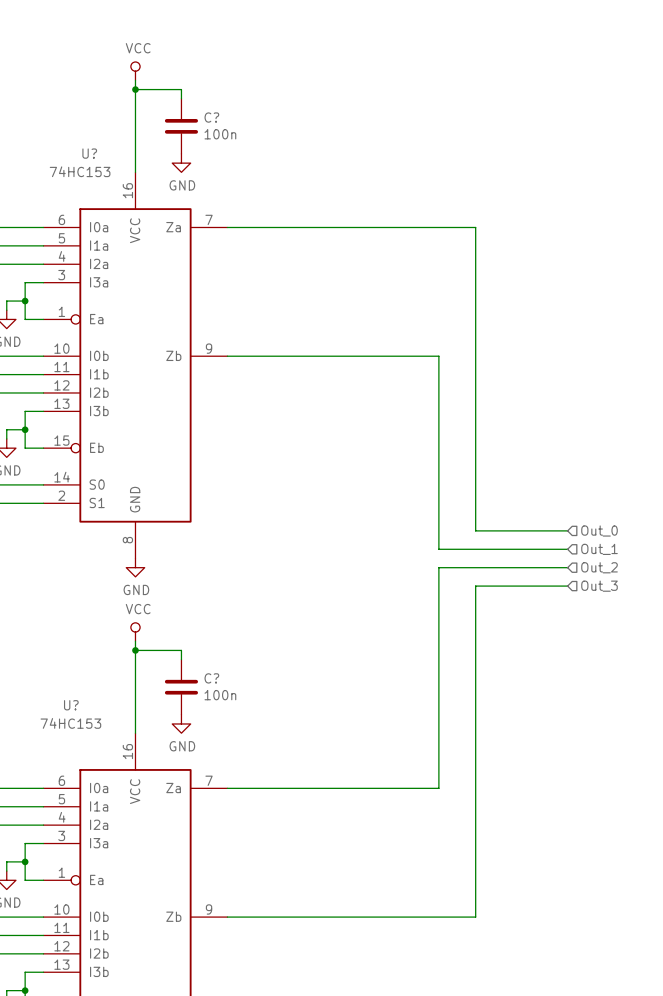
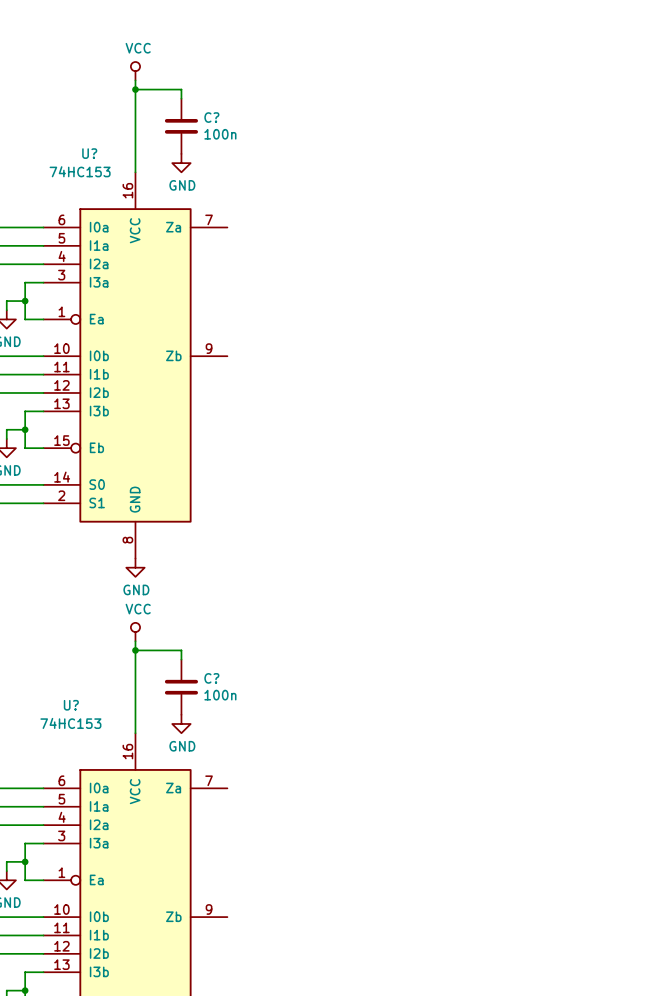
wire: (227, 227) (475, 227) (475, 530) (567, 530) -> none
wire: (227, 356) (438, 356) (438, 549) (567, 549) -> none
hierarchical label: Out_0 (599, 531) -> none
hierarchical label: Out_1 (599, 549) -> none
wire: (567, 567) (438, 567) (438, 788) (227, 788) -> none
hierarchical label: Out_2 (599, 567) -> none
wire: (567, 586) (475, 586) (475, 917) (227, 917) -> none
hierarchical label: Out_3 (599, 586) -> none

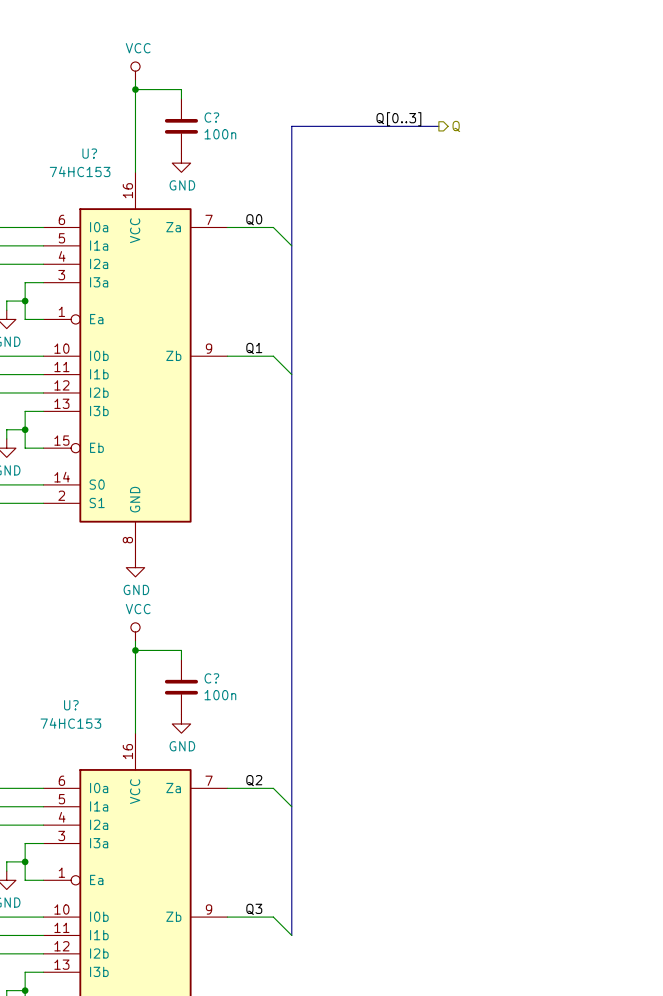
label: none -> Q[0..3] (398, 119)
bus: none -> (438, 126) (291, 126) (291, 935)
hierarchical label: none -> Q (456, 126)
label: none -> Q0 (254, 219)
wire: none -> (227, 227) (273, 227) (291, 245)
label: none -> Q1 (254, 348)
wire: none -> (227, 356) (273, 356) (291, 374)
label: none -> Q2 (254, 780)
wire: none -> (227, 788) (273, 788) (291, 806)
label: none -> Q3 (254, 909)
wire: none -> (227, 917) (273, 917) (291, 935)

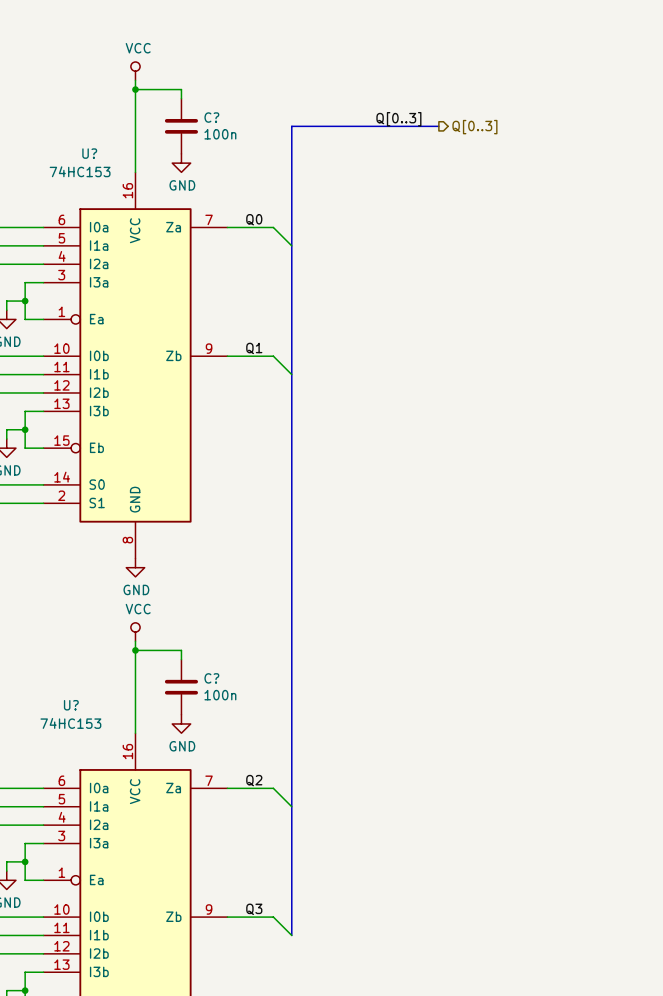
hierarchical label: Q (456, 126) -> Q[0..3] (474, 127)

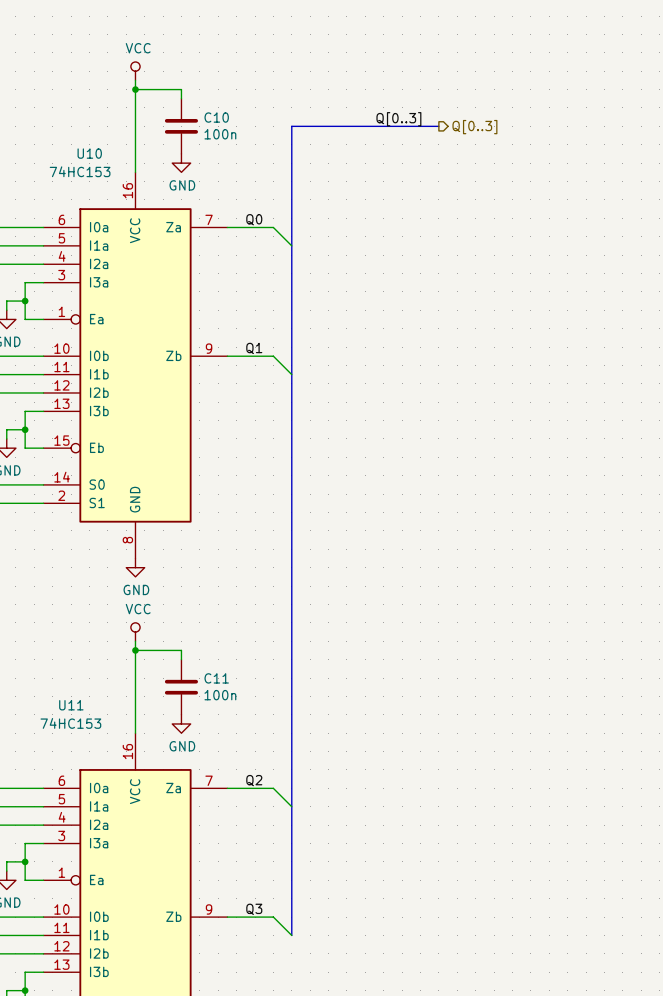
C? name: C? (211, 117) -> C10 (216, 117)
U? name: U? (89, 153) -> U10 (89, 153)
C? name: C? (211, 678) -> C11 (216, 678)
U? name: U? (71, 705) -> U11 (71, 705)

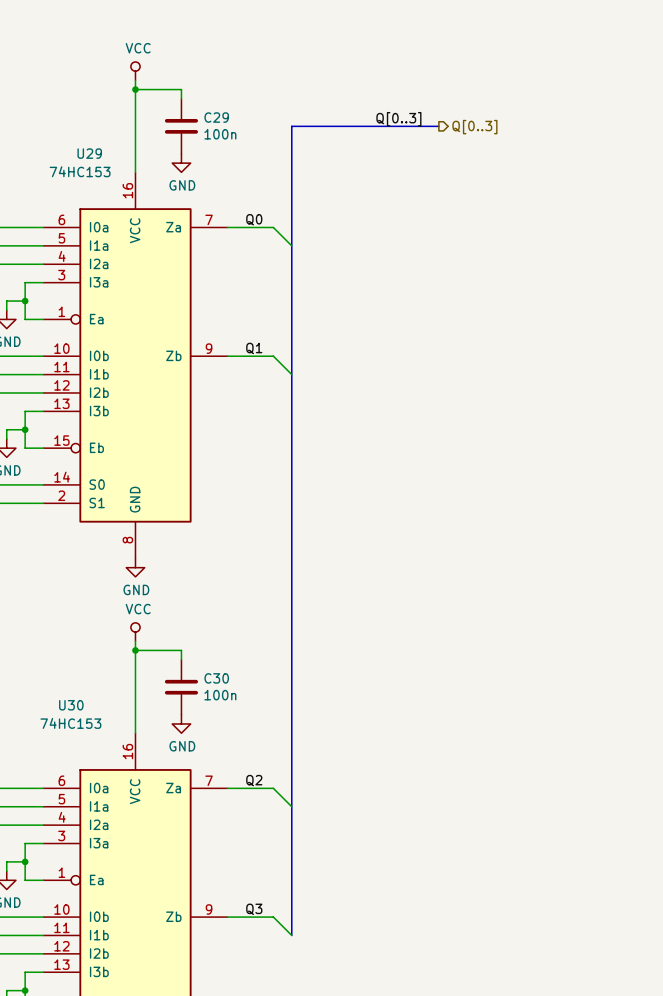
C10 name: C10 (216, 117) -> C29 (216, 117)
U10 name: U10 (89, 153) -> U29 (89, 153)
C11 name: C11 (216, 678) -> C30 (216, 678)
U11 name: U11 (71, 705) -> U30 (71, 705)

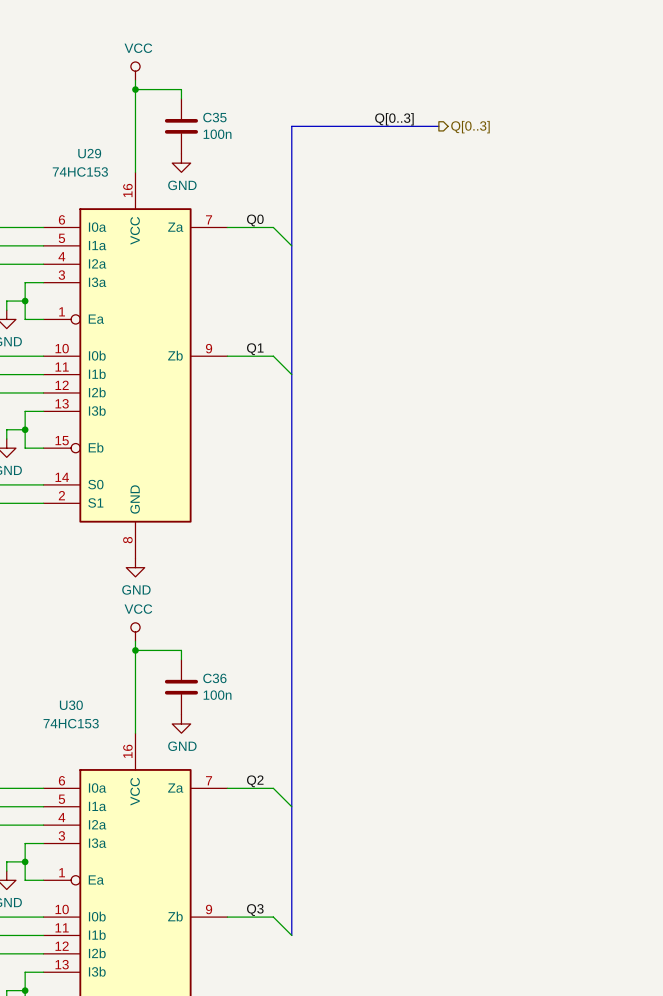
C29 name: C29 (216, 117) -> C35 (214, 117)
C30 name: C30 (216, 678) -> C36 (214, 678)

